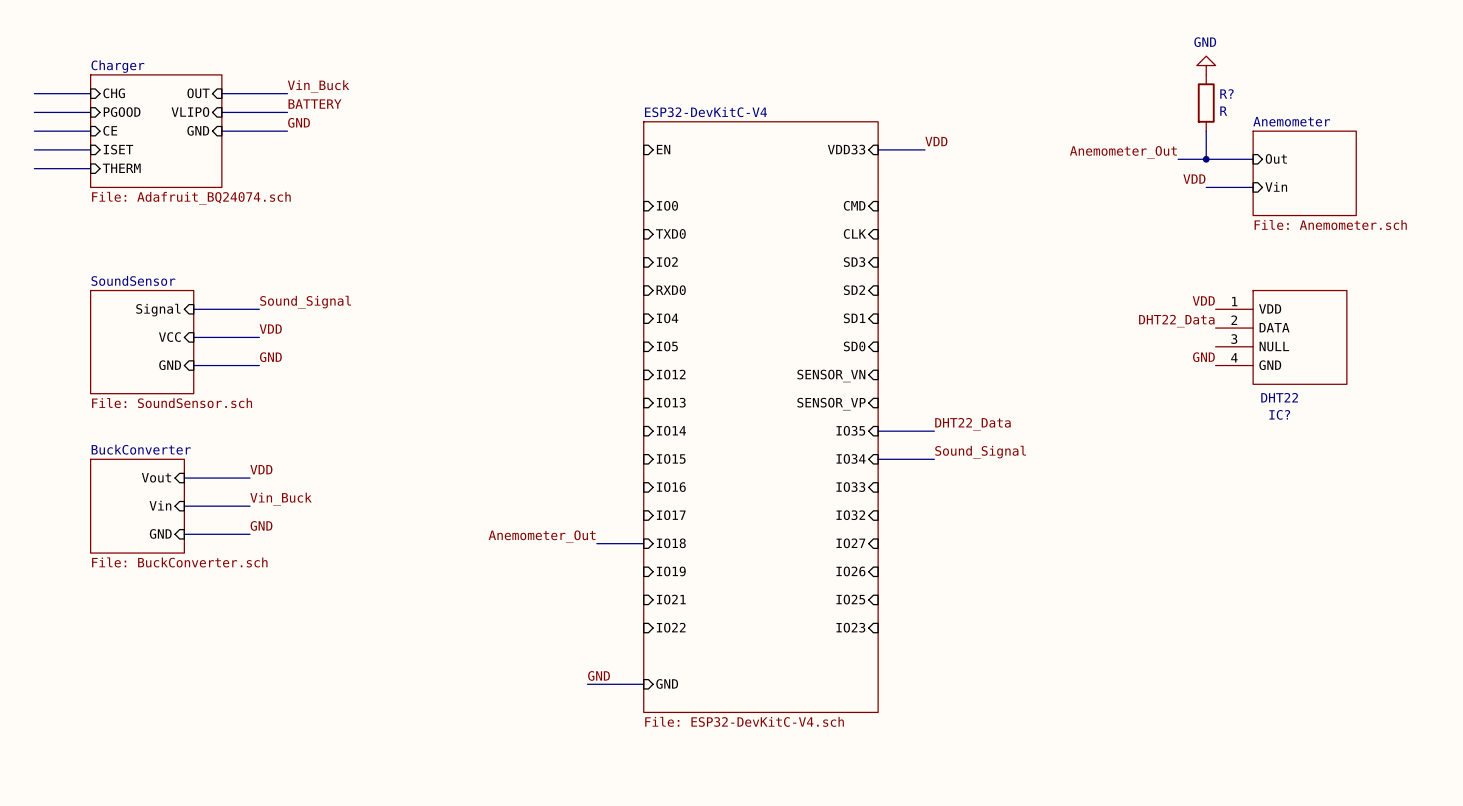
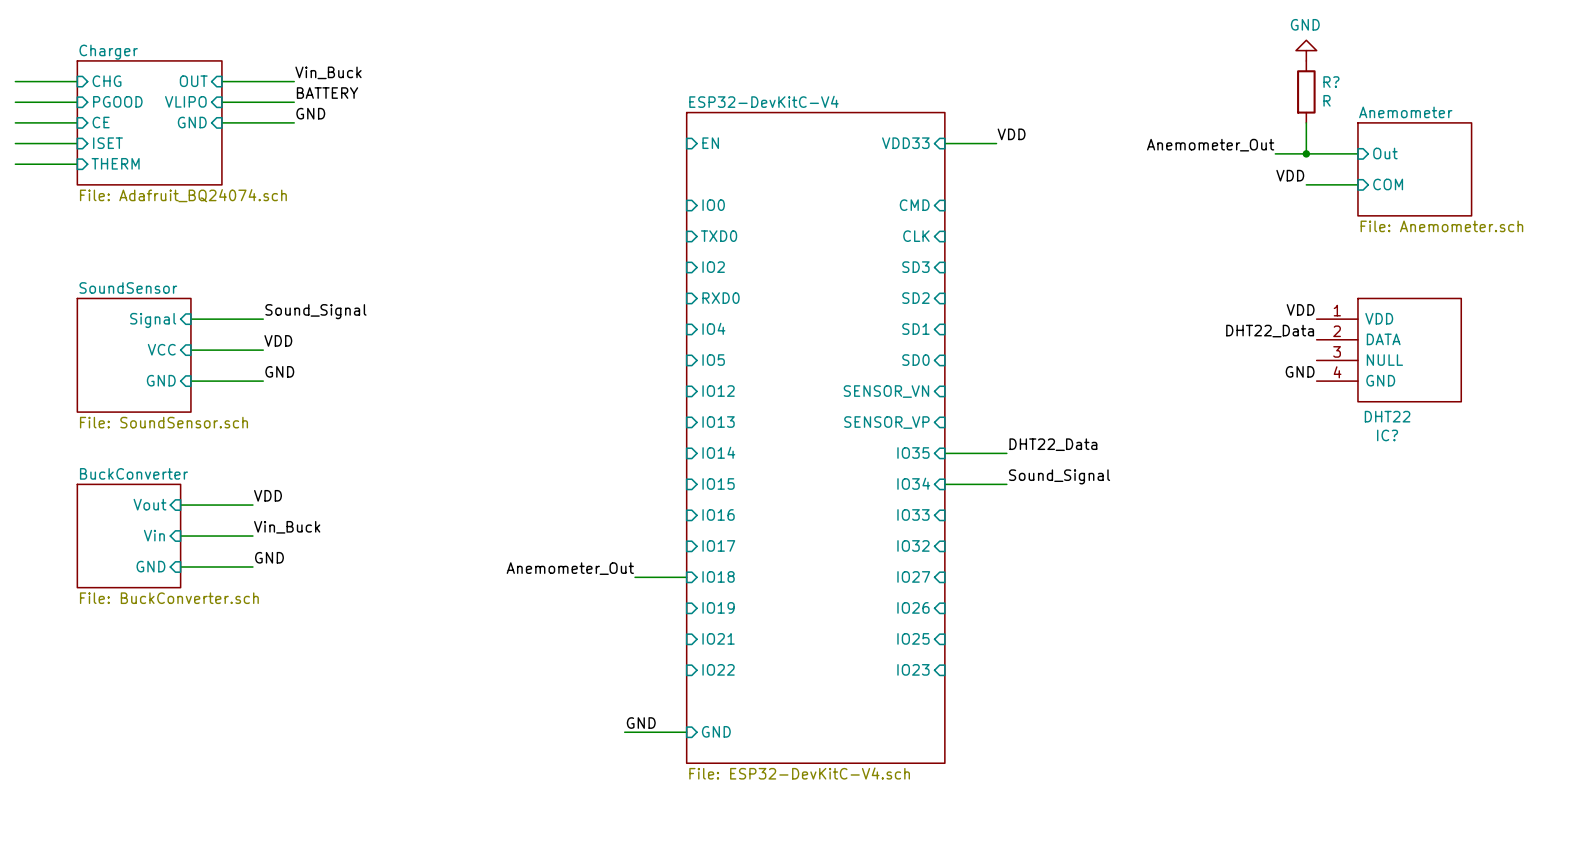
sheet pin: Vin (1276, 186) -> COM (1388, 184)

